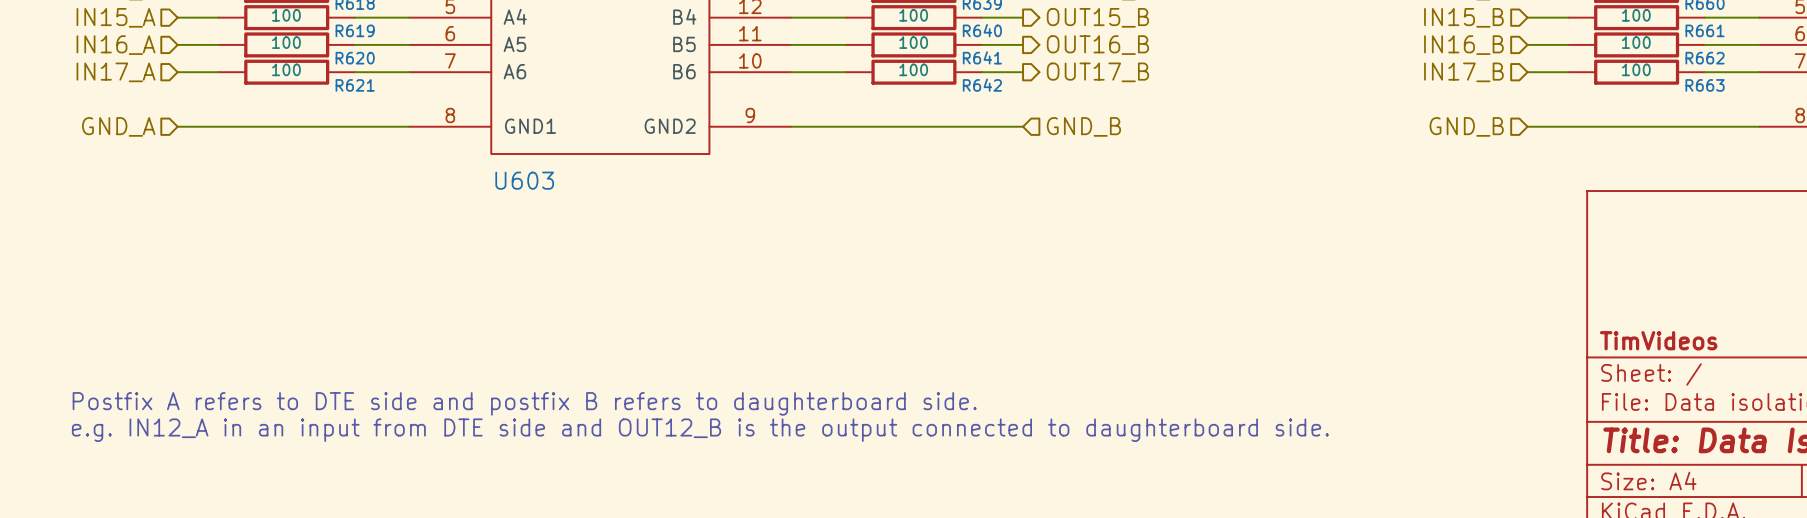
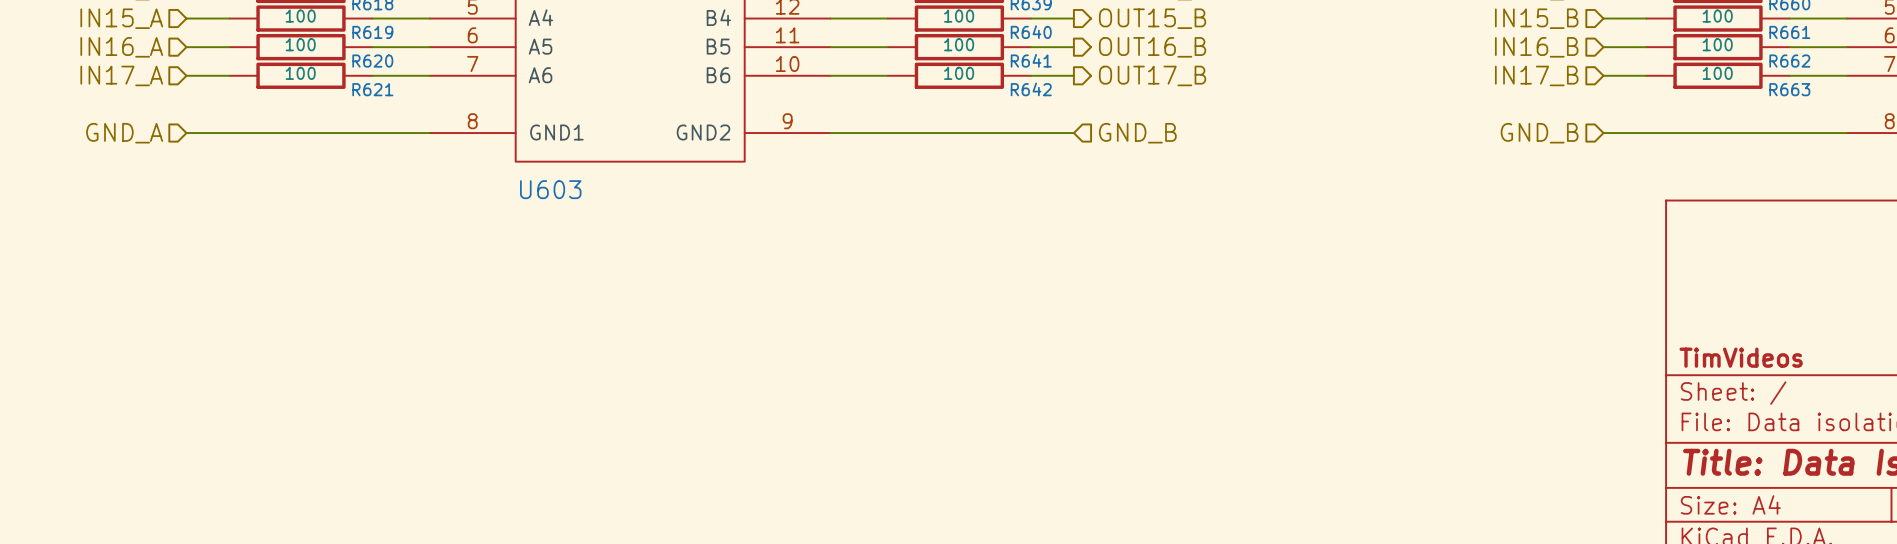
text: Postfix A refers to DTE side and postfix B refers to daughterboard side. (524, 403) -> none
text: e.g. IN12_A in an input from DTE side and OUT12_B is the output connected to daughterboard side. (700, 430) -> none

